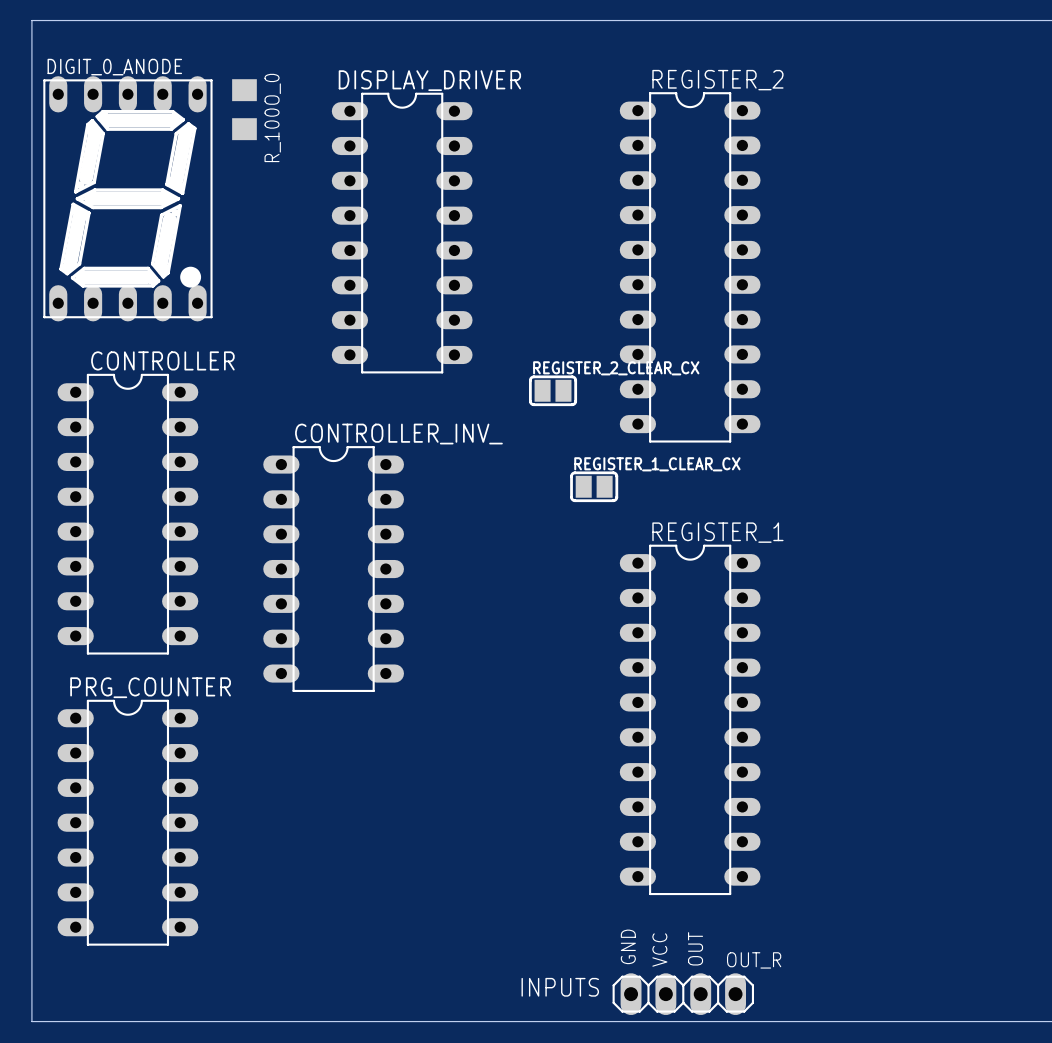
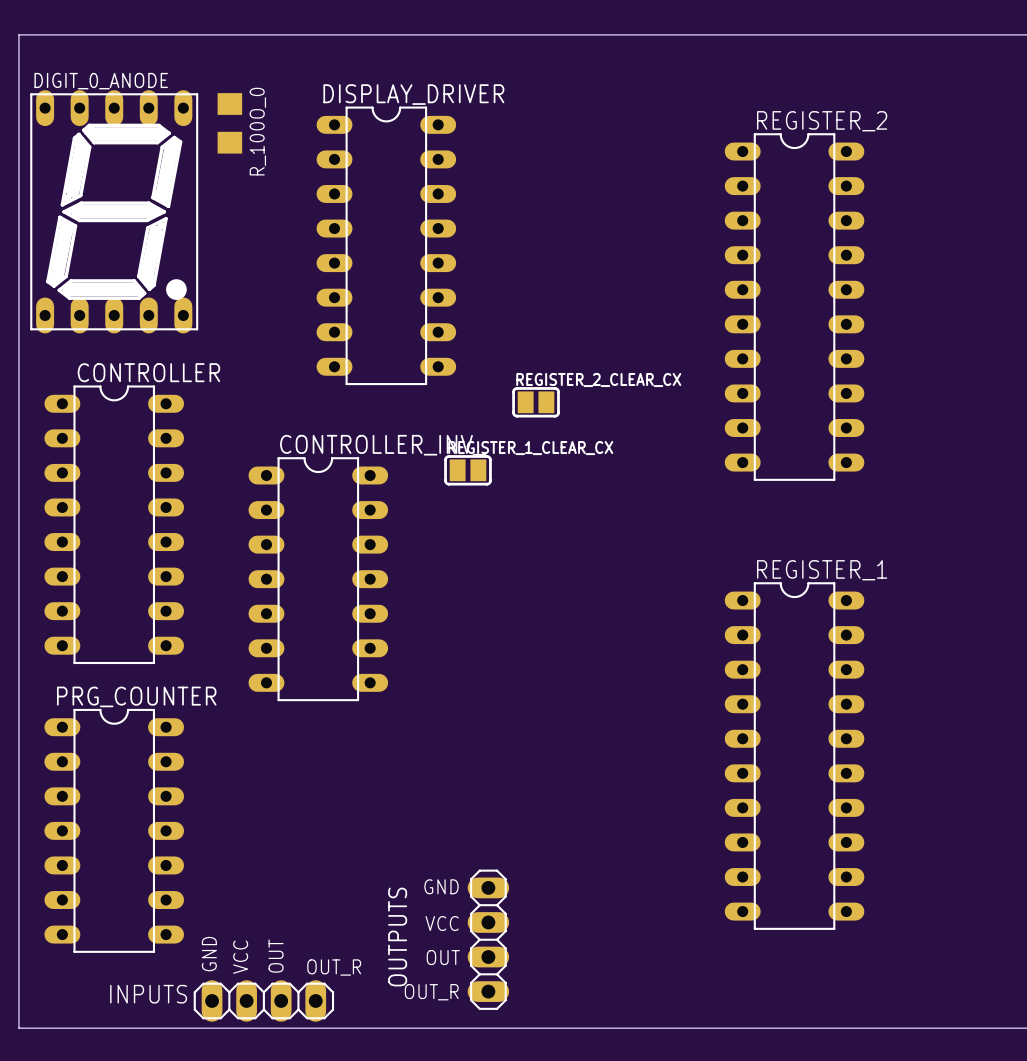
REGISTER_2 position: (690, 267) -> (794, 307)
REGISTER_1_CLEAR_CX position: (594, 486) -> (467, 470)
REGISTER_1 position: (690, 719) -> (794, 756)
OUTPUTS: none -> (488, 939)
text: none -> GND (209, 954)
text rotation: 0° (628, 946) -> 90° clockwise (441, 886)
text position: GND (628, 946) -> GND (441, 886)
text: none -> OUT (276, 956)
text: OUT (695, 948) -> none
text: none -> VCC (240, 957)
text: none -> OUT (443, 957)
text rotation: 0° (659, 950) -> 90° clockwise (442, 923)
text position: VCC (659, 950) -> VCC (442, 923)
text: none -> OUT_R (334, 967)
text: OUT_R (754, 960) -> none
text: none -> OUT_R (431, 992)
text: none -> INPUTS (148, 994)
text: INPUTS (560, 987) -> none
part: none -> (263, 1000)
part: (683, 994) -> none

